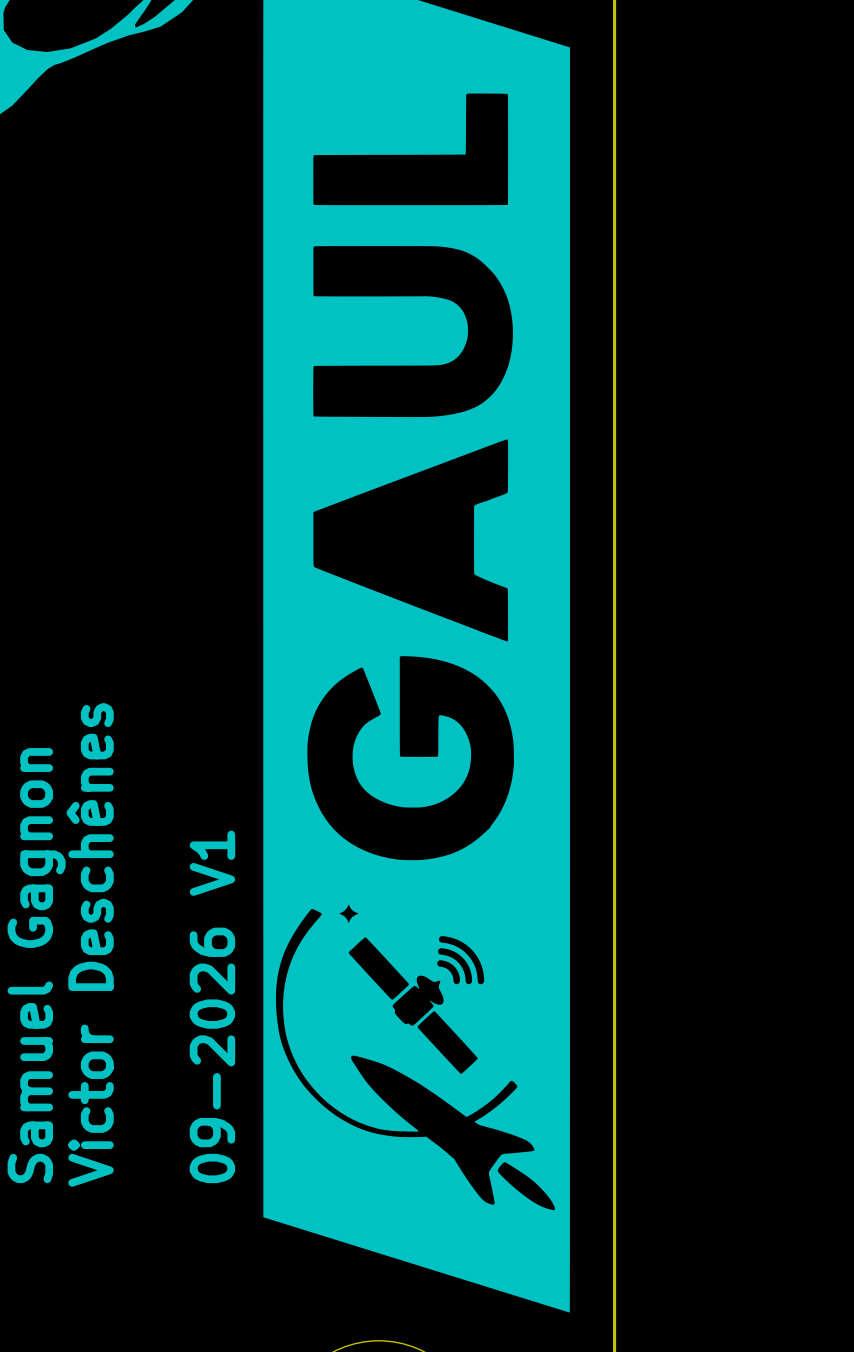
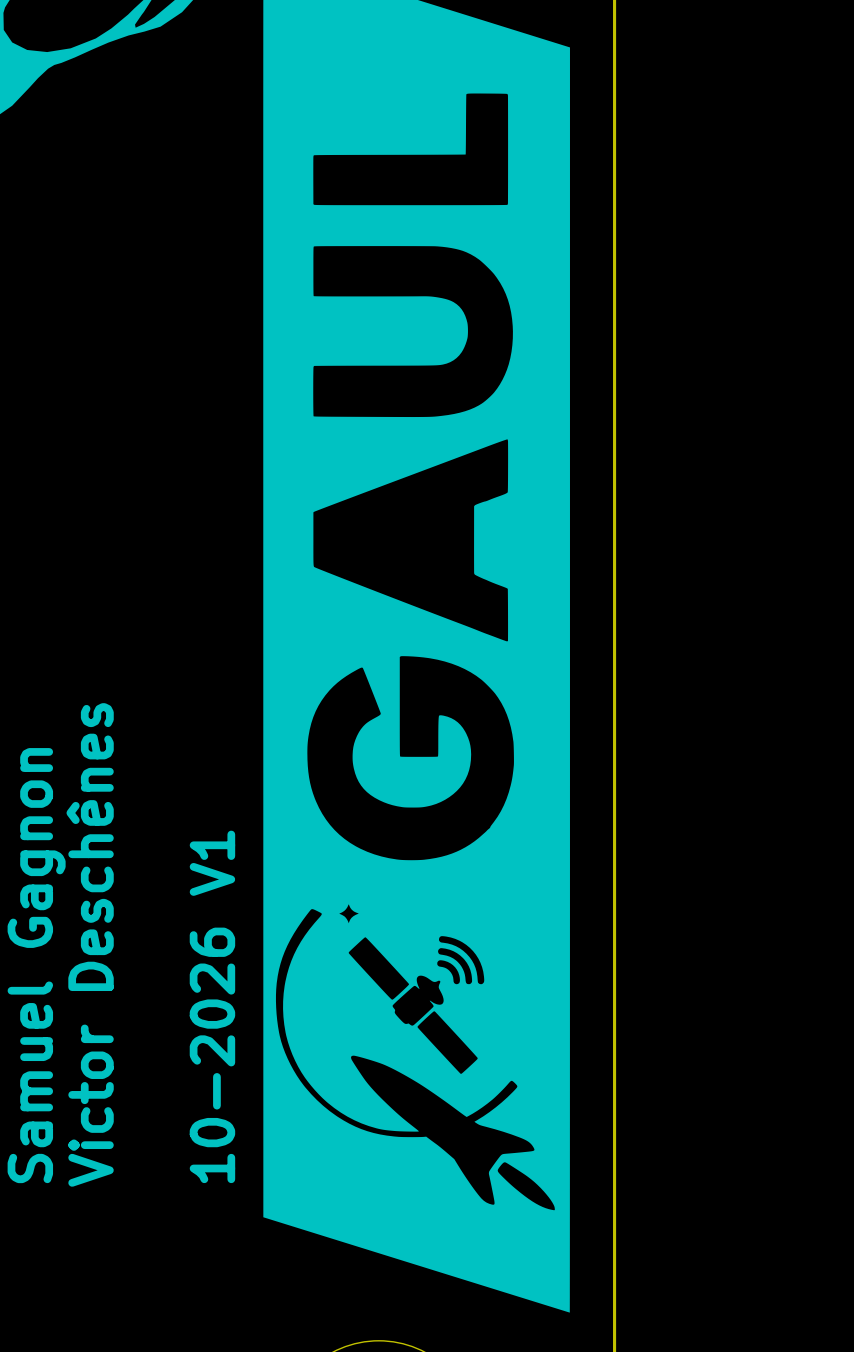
text: 09-2026 V1 (212, 1006) -> 10-2026 V1 (212, 1006)

